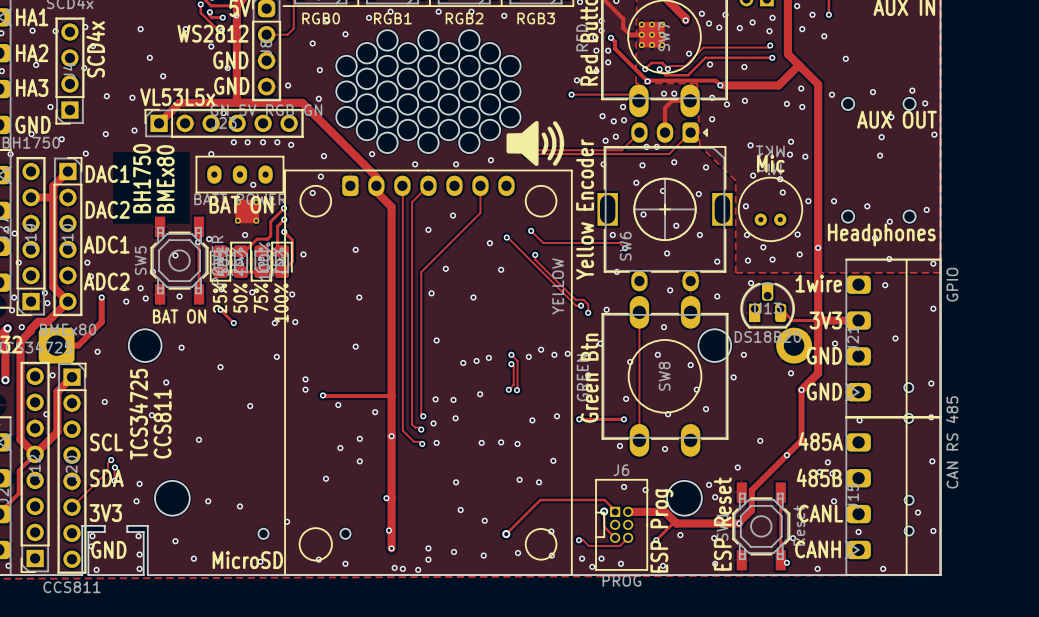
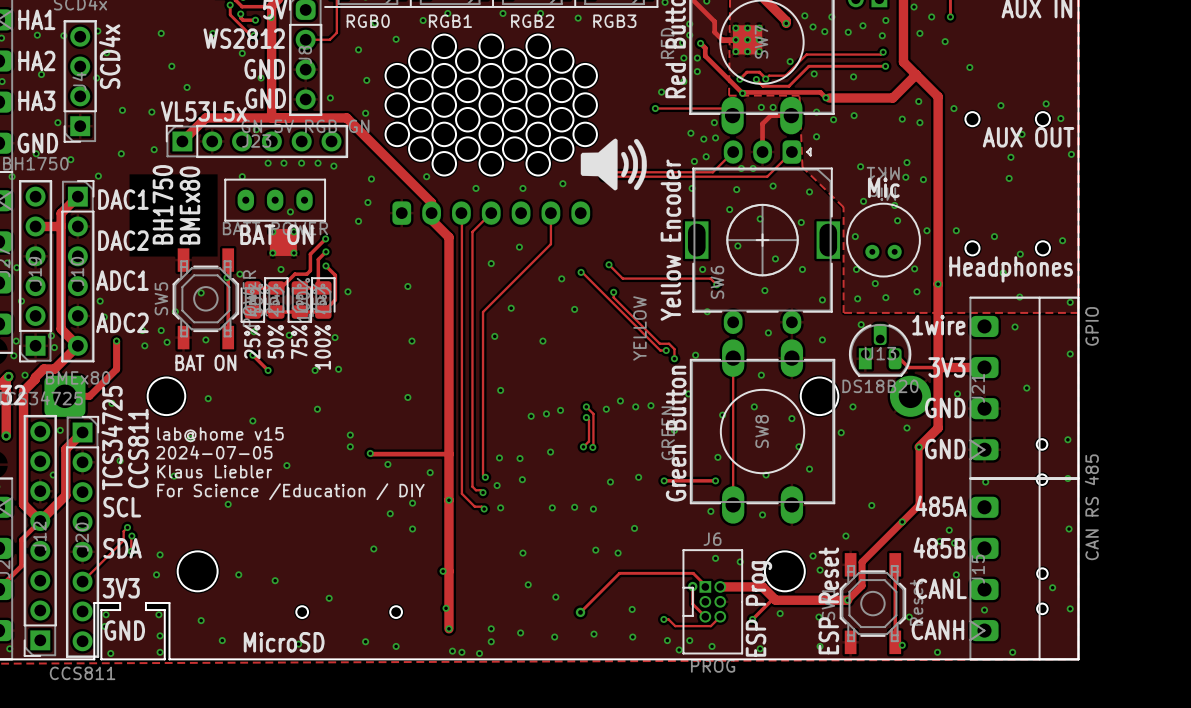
part: (428, 372) -> none
text: Green Btn (589, 378) -> Green Button (676, 433)
text: none -> lab@home v15 (220, 434)
text: none -> 2024-07-05 (214, 452)
text: none -> Klaus Liebler (214, 471)
text position: TCS34725 (138, 414) -> TCS34725 (112, 438)
text position: CCS811 (162, 423) -> CCS811 (138, 448)
text: none -> For Science /Education / DIY (290, 491)

